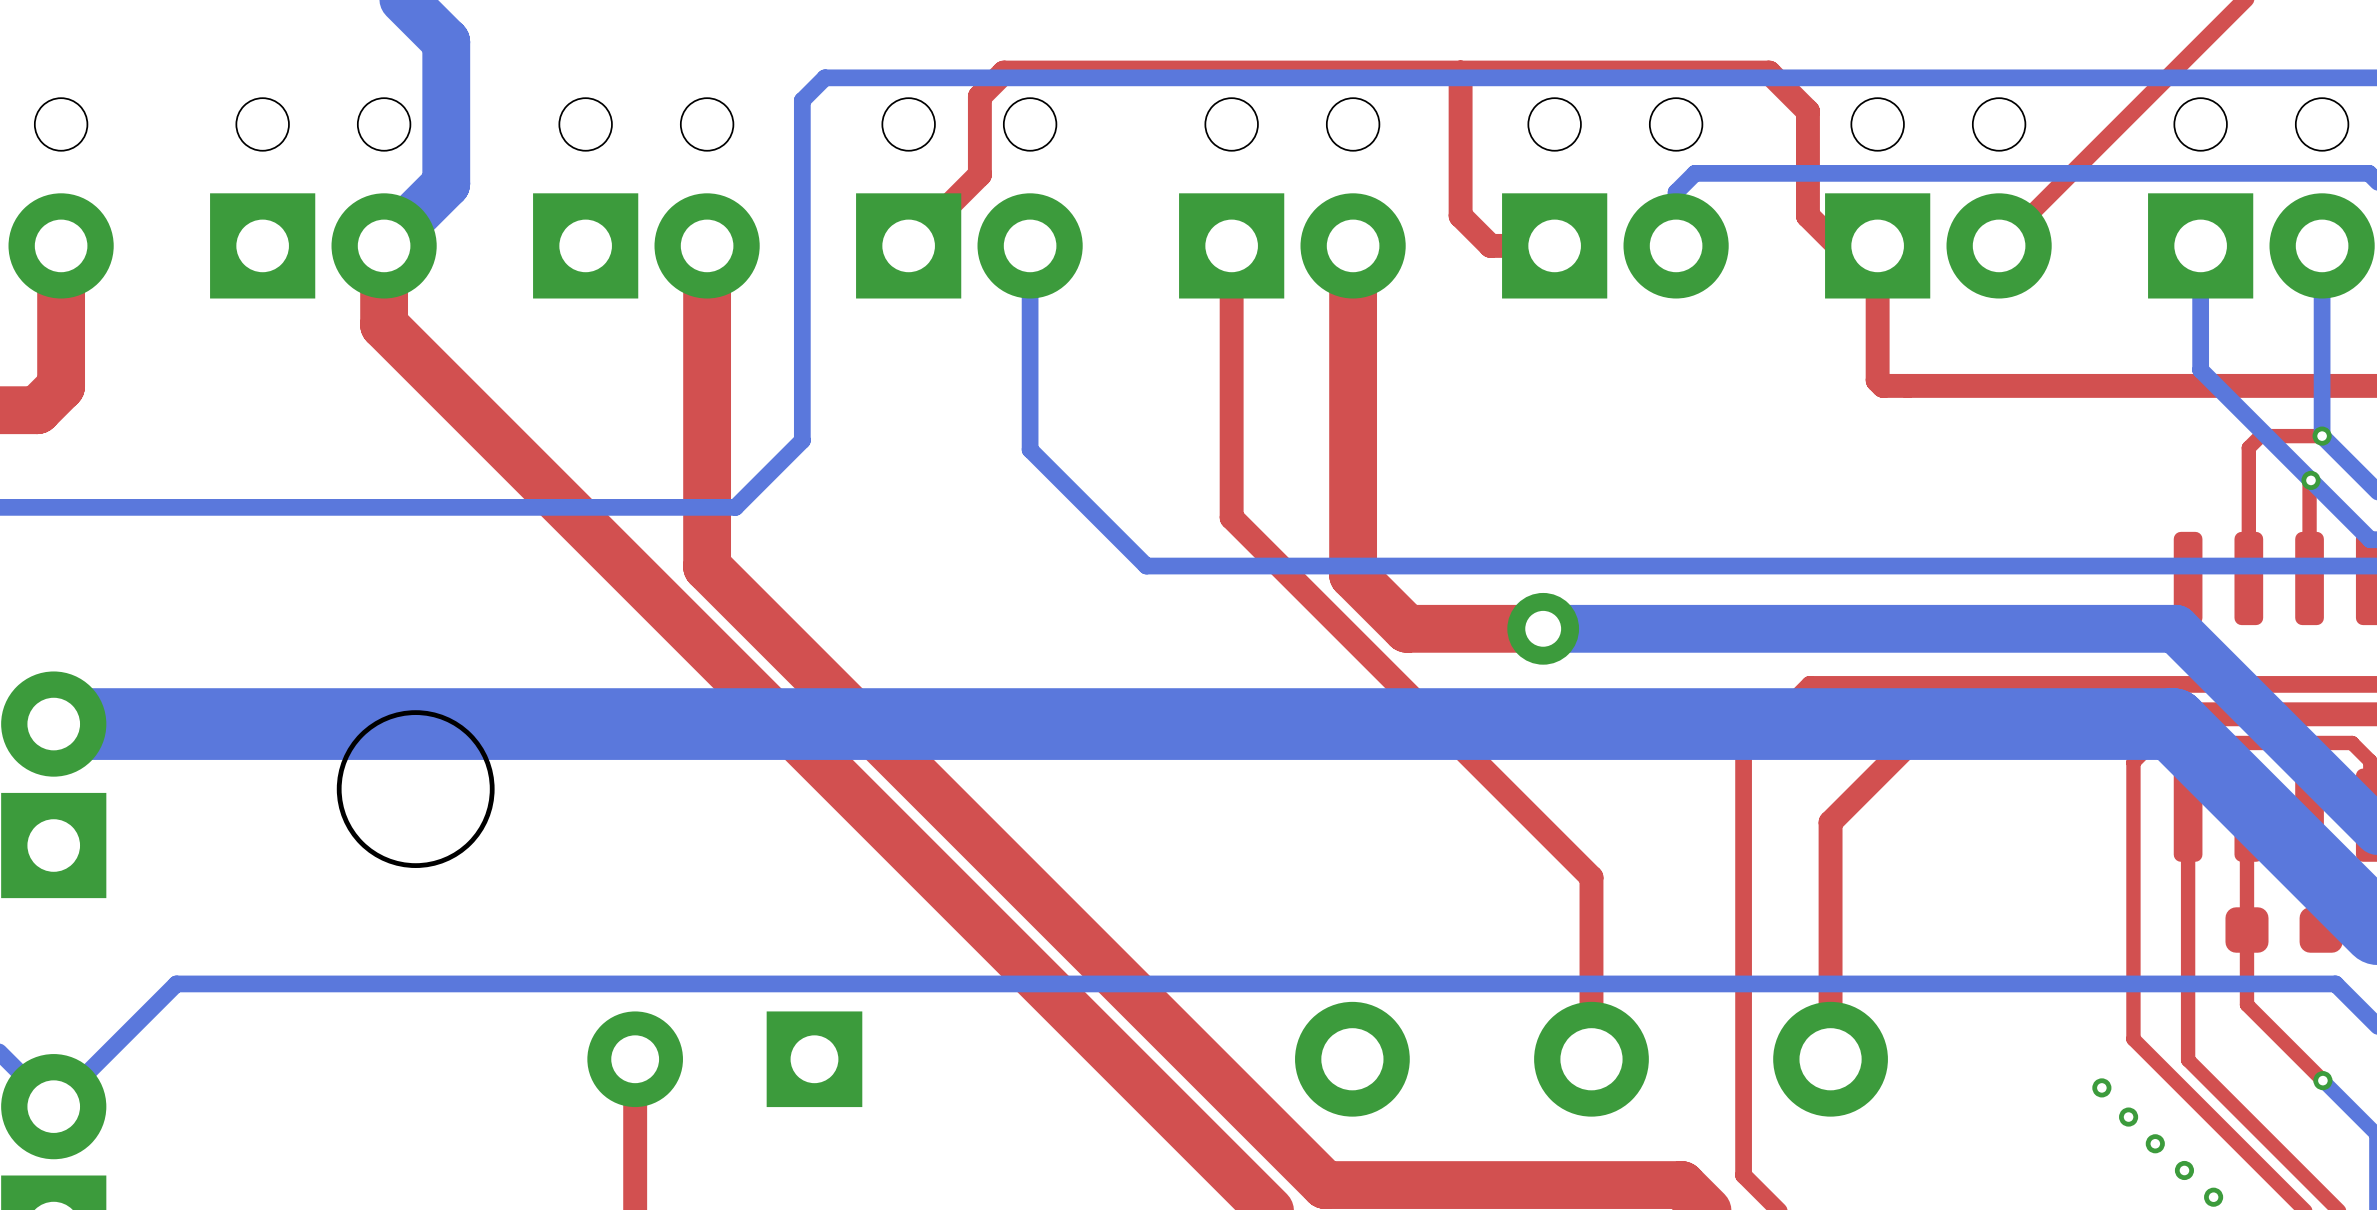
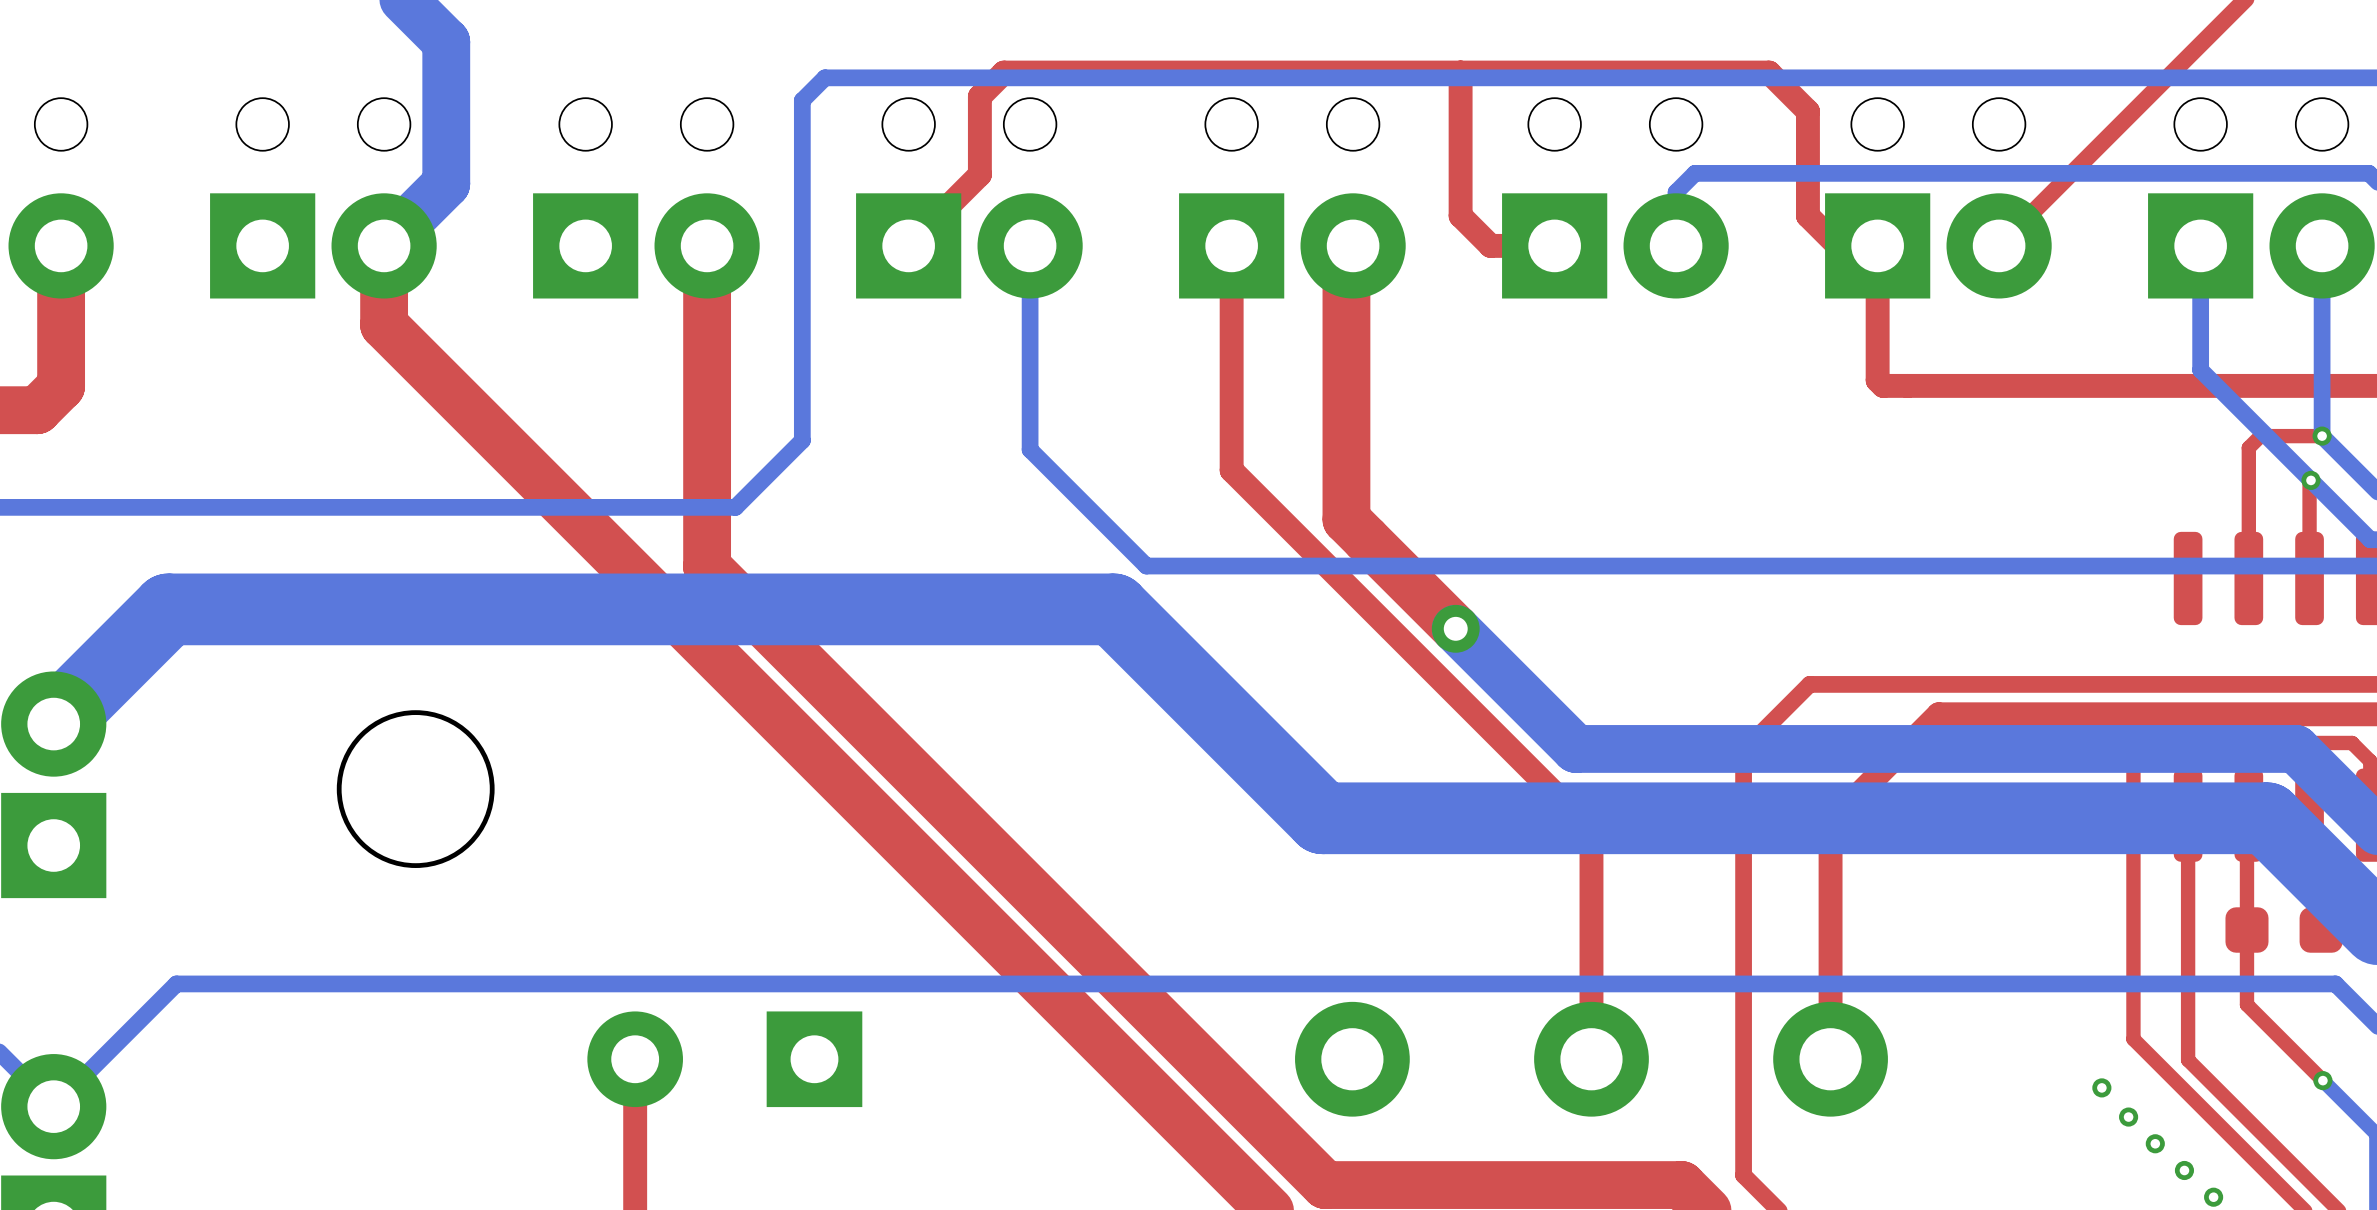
top track: (1353, 245) (1353, 574) (1407, 628) (1543, 628) -> (1353, 245) (1346, 252) (1346, 519) (1455, 628)
top track: (1231, 470) (1231, 517) (1591, 877) -> (1231, 470) (1591, 830) (1591, 877)
via: none -> (1455, 628)
bottom track: (1543, 628) (2175, 628) (2295, 748) -> (1455, 628) (1575, 748) (2295, 748)
via: (1543, 628) -> none
bottom track: (53, 724) (2172, 724) (2267, 818) -> (53, 724) (168, 609) (1113, 609) (1322, 818) (2267, 818)

